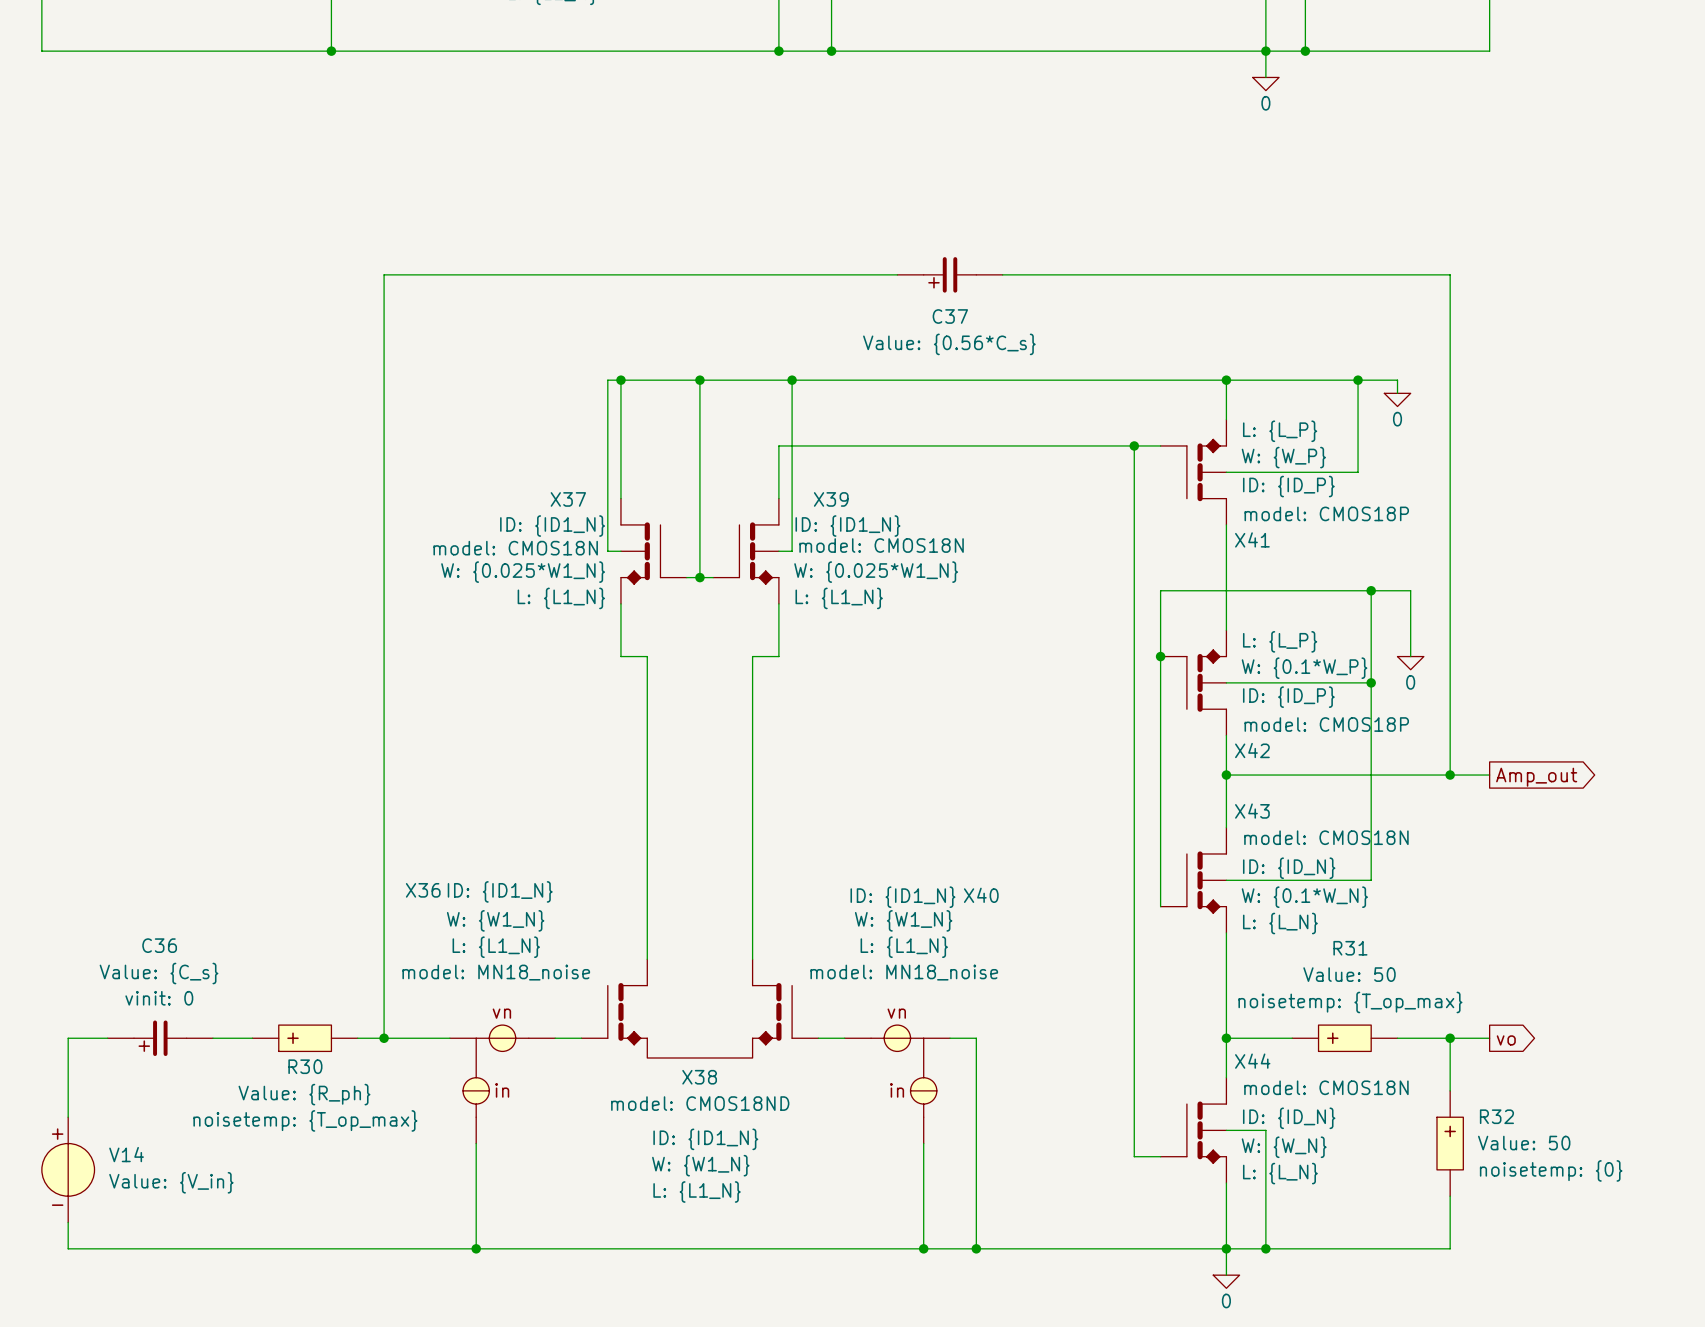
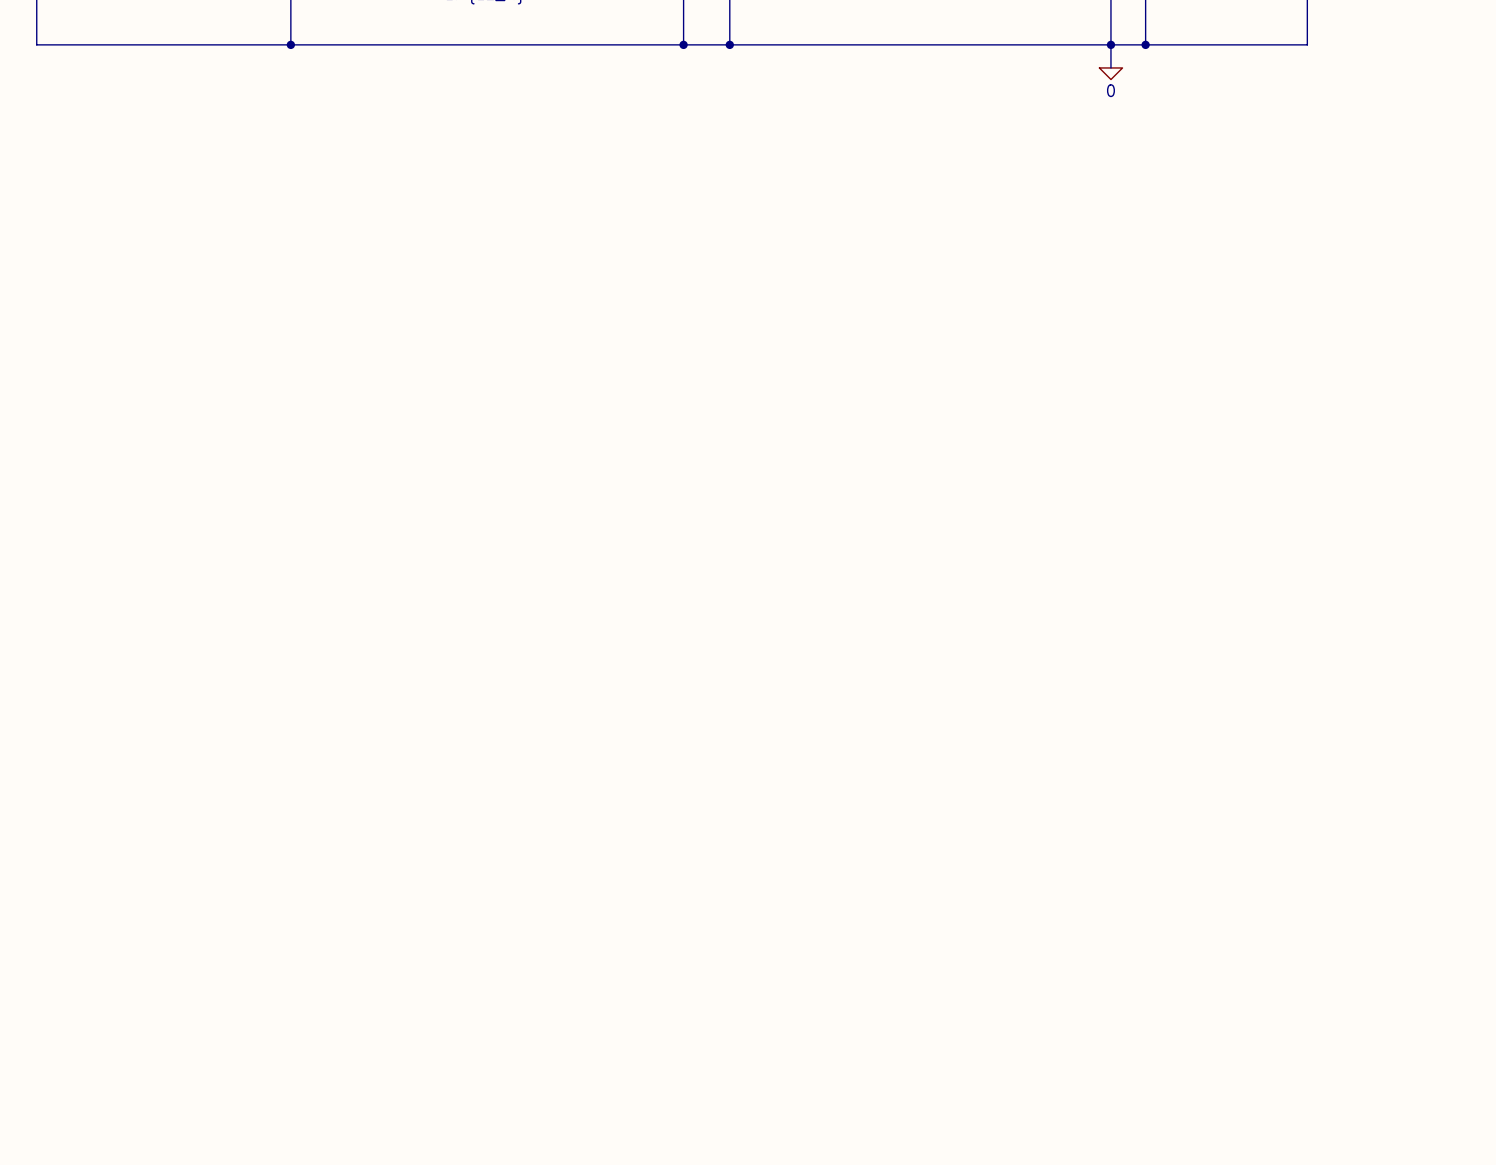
wire: (897, 274) (384, 274) (384, 1038) -> none
C37: Value: {0.56*C_s} (950, 274) -> none
wire: (1002, 274) (1450, 274) (1450, 775) -> none
wire: (620, 380) (620, 498) -> none
junction: (620, 380) -> none
wire: (699, 380) (699, 577) -> none
junction: (699, 380) -> none
wire: (792, 380) (792, 551) (778, 551) -> none
junction: (792, 380) -> none
wire: (1226, 380) (1226, 419) -> none
junction: (1226, 380) -> none
wire: (1358, 380) (1358, 472) (1226, 472) -> none
junction: (1358, 380) -> none
wire: (1397, 393) (1397, 380) (607, 380) (607, 551) (620, 551) -> none
power symbol: 0 (1397, 399) -> none
wire: (1134, 445) (1134, 1156) (1160, 1156) -> none
junction: (1134, 445) -> none
wire: (1160, 445) (778, 445) (778, 498) -> none
X41: (1193, 472) -> none
wire: (1226, 524) (1226, 630) -> none
X37: (653, 551) -> none
X39: (746, 551) -> none
wire: (686, 577) (713, 577) -> none
junction: (699, 577) -> none
wire: (1371, 590) (1371, 880) (1226, 880) -> none
junction: (1371, 590) -> none
wire: (620, 603) (620, 656) (647, 656) (647, 959) -> none
wire: (778, 603) (778, 656) (752, 656) (752, 959) -> none
junction: (1160, 656) -> none
wire: (1410, 656) (1410, 590) (1160, 590) (1160, 906) -> none
power symbol: 0 (1410, 663) -> none
X42: (1193, 682) -> none
wire: (1226, 682) (1371, 682) -> none
junction: (1371, 682) -> none
wire: (1226, 735) (1226, 827) -> none
wire: (1226, 775) (1489, 775) -> none
junction: (1226, 775) -> none
junction: (1450, 775) -> none
global label: Amp_out (1536, 777) -> none
X43: (1193, 880) -> none
wire: (1226, 932) (1226, 1077) -> none
X38: (699, 1008) -> none
wire: (107, 1038) (68, 1038) (68, 1117) -> none
C36: Value: {C_s} (160, 1038) -> none
wire: (212, 1038) (252, 1038) -> none
R30: Value: {R_ph} (305, 1038) -> none
wire: (357, 1038) (449, 1038) -> none
junction: (384, 1038) -> none
wire: (555, 1038) (581, 1038) -> none
wire: (818, 1038) (844, 1038) -> none
wire: (950, 1038) (976, 1038) (976, 1248) -> none
wire: (1226, 1038) (1292, 1038) -> none
junction: (1226, 1038) -> none
R31: Value: 50 (1344, 1038) -> none
wire: (1397, 1038) (1489, 1038) -> none
wire: (1450, 1038) (1450, 1090) -> none
junction: (1450, 1038) -> none
global label: vo (1506, 1040) -> none
X36: (502, 1084) -> none
X40: (897, 1084) -> none
X44: (1193, 1130) -> none
wire: (1226, 1130) (1265, 1130) (1265, 1248) -> none
wire: (476, 1143) (476, 1248) -> none
wire: (923, 1143) (923, 1248) -> none
R32: Value: 50 (1450, 1143) -> none
V14: Value: {V_in} (68, 1169) -> none
wire: (1226, 1183) (1226, 1275) -> none
wire: (1450, 1196) (1450, 1248) (68, 1248) (68, 1222) -> none
junction: (476, 1248) -> none
junction: (923, 1248) -> none
junction: (976, 1248) -> none
junction: (1226, 1248) -> none
junction: (1265, 1248) -> none
power symbol: 0 (1226, 1281) -> none

